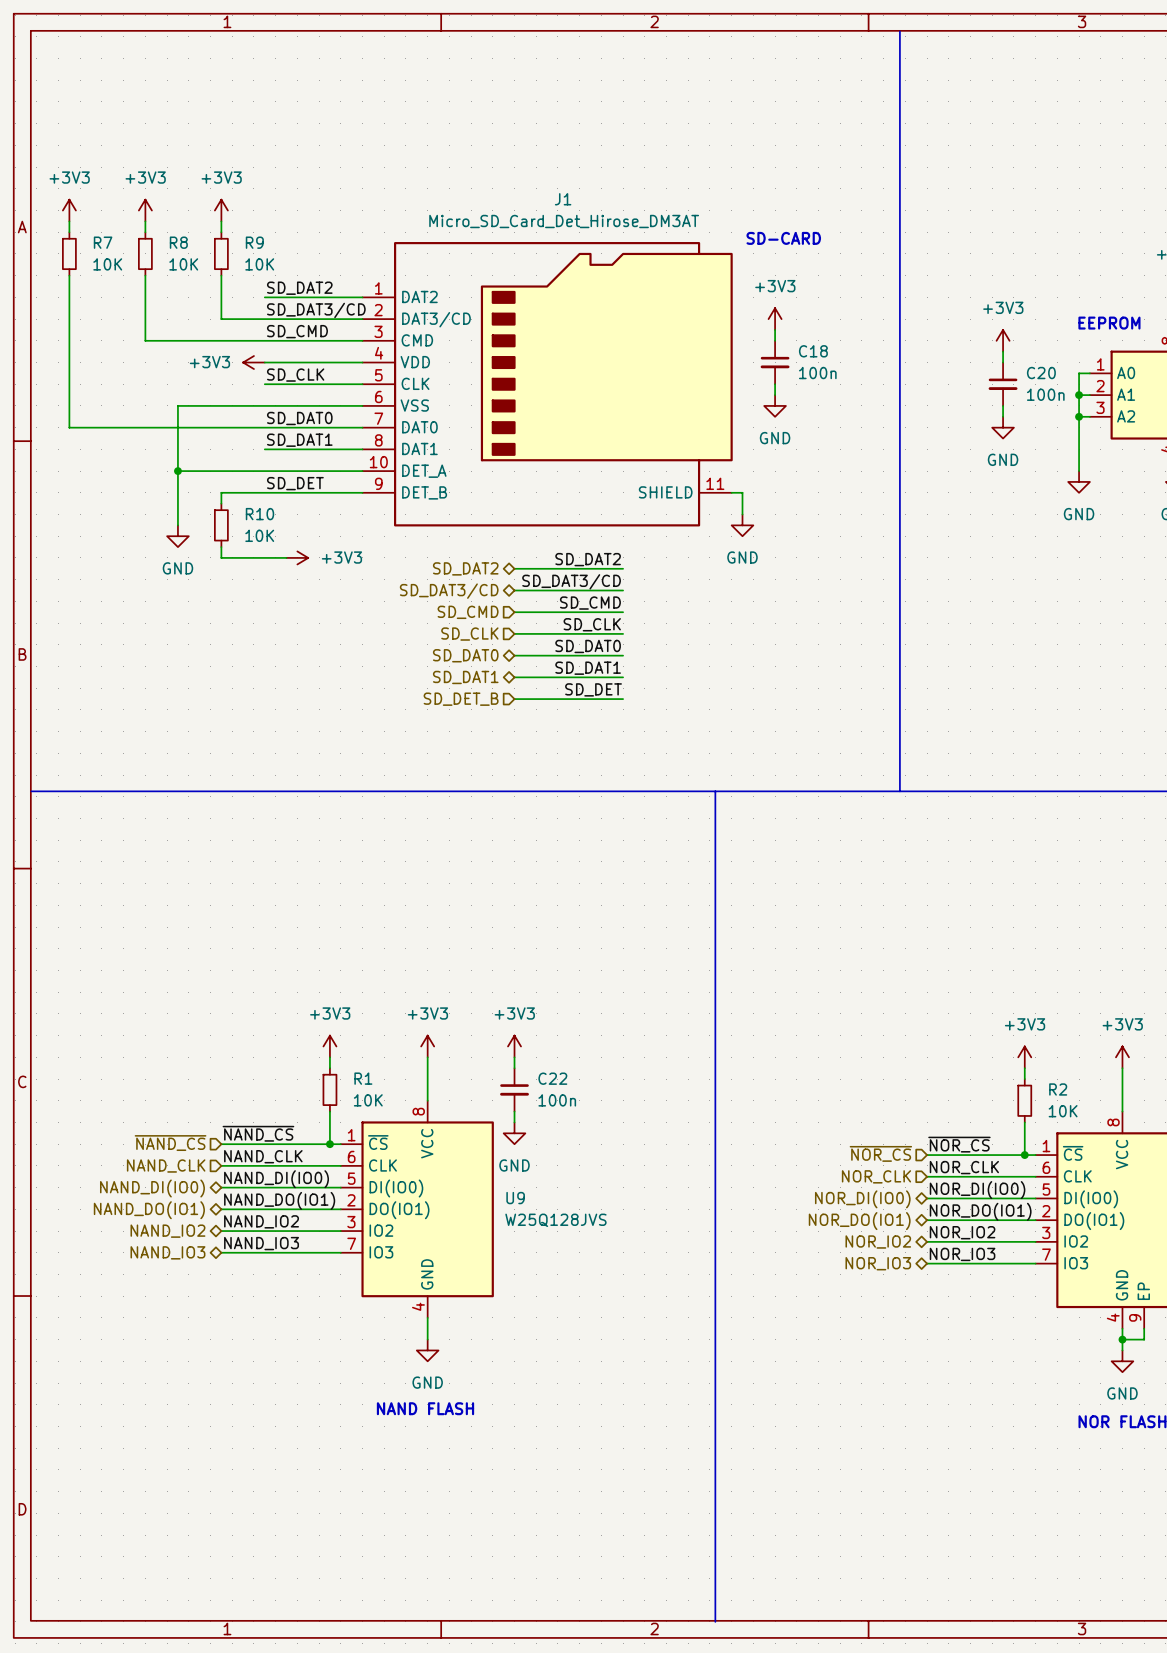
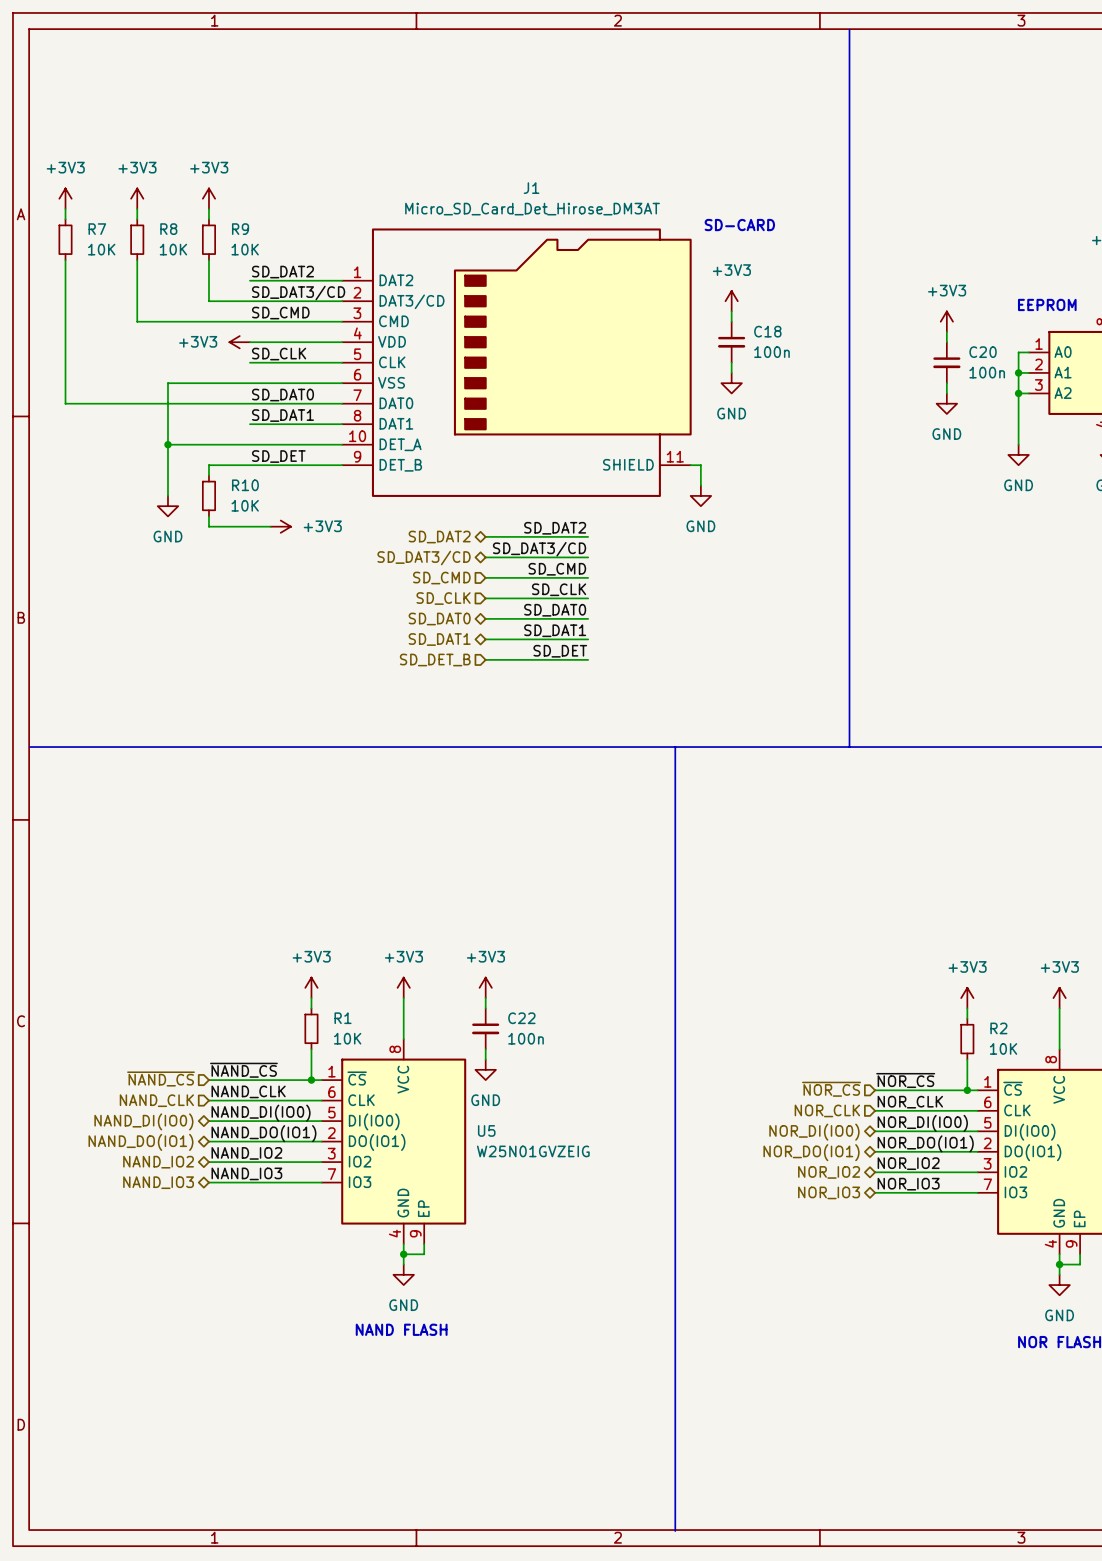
U9: W25Q128JVS (417, 1209) -> none
U5: none -> W25N01GVZEIG (393, 1141)
wire: none -> (424, 1244) (424, 1254) (403, 1254)
junction: none -> (403, 1254)

